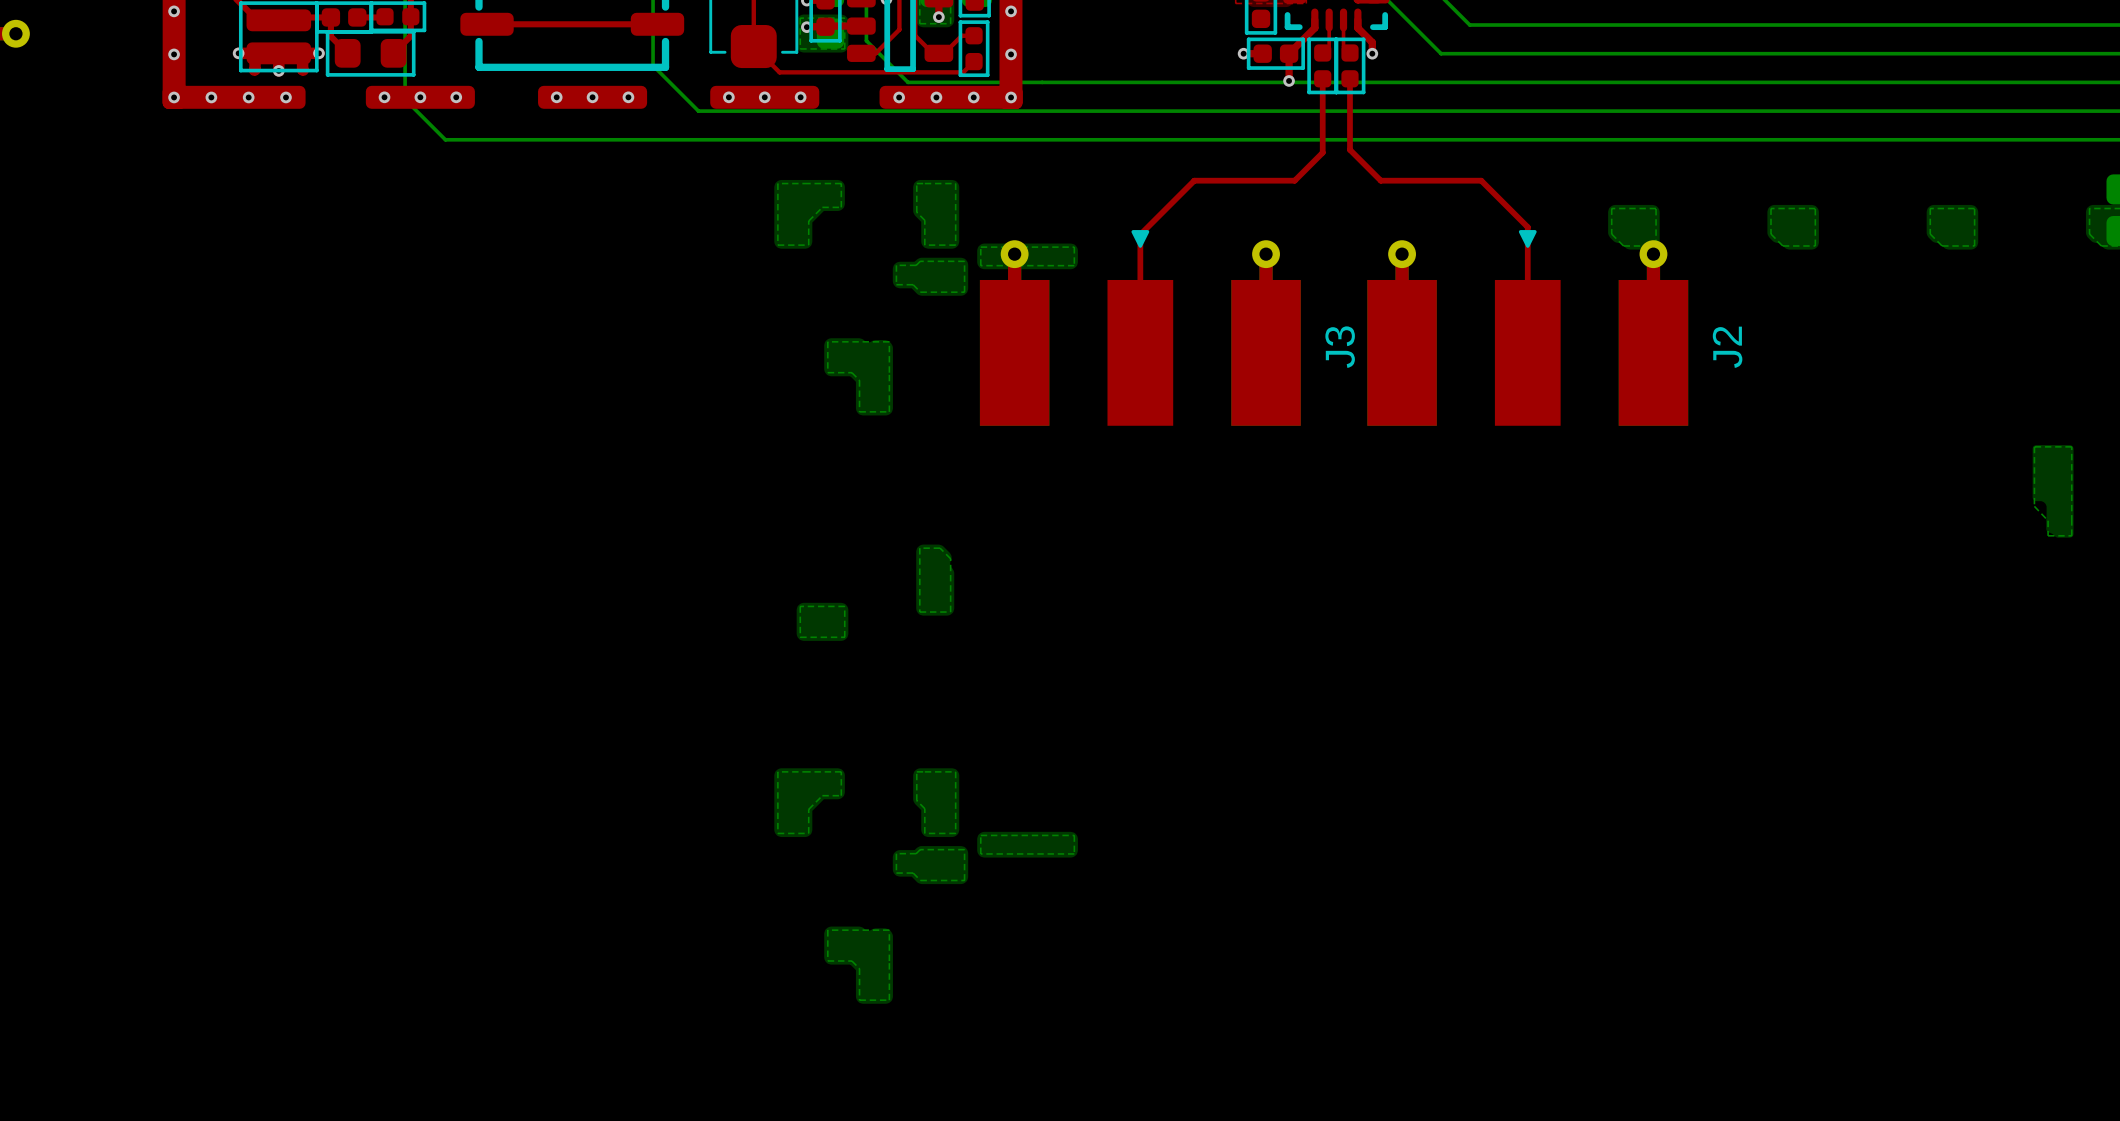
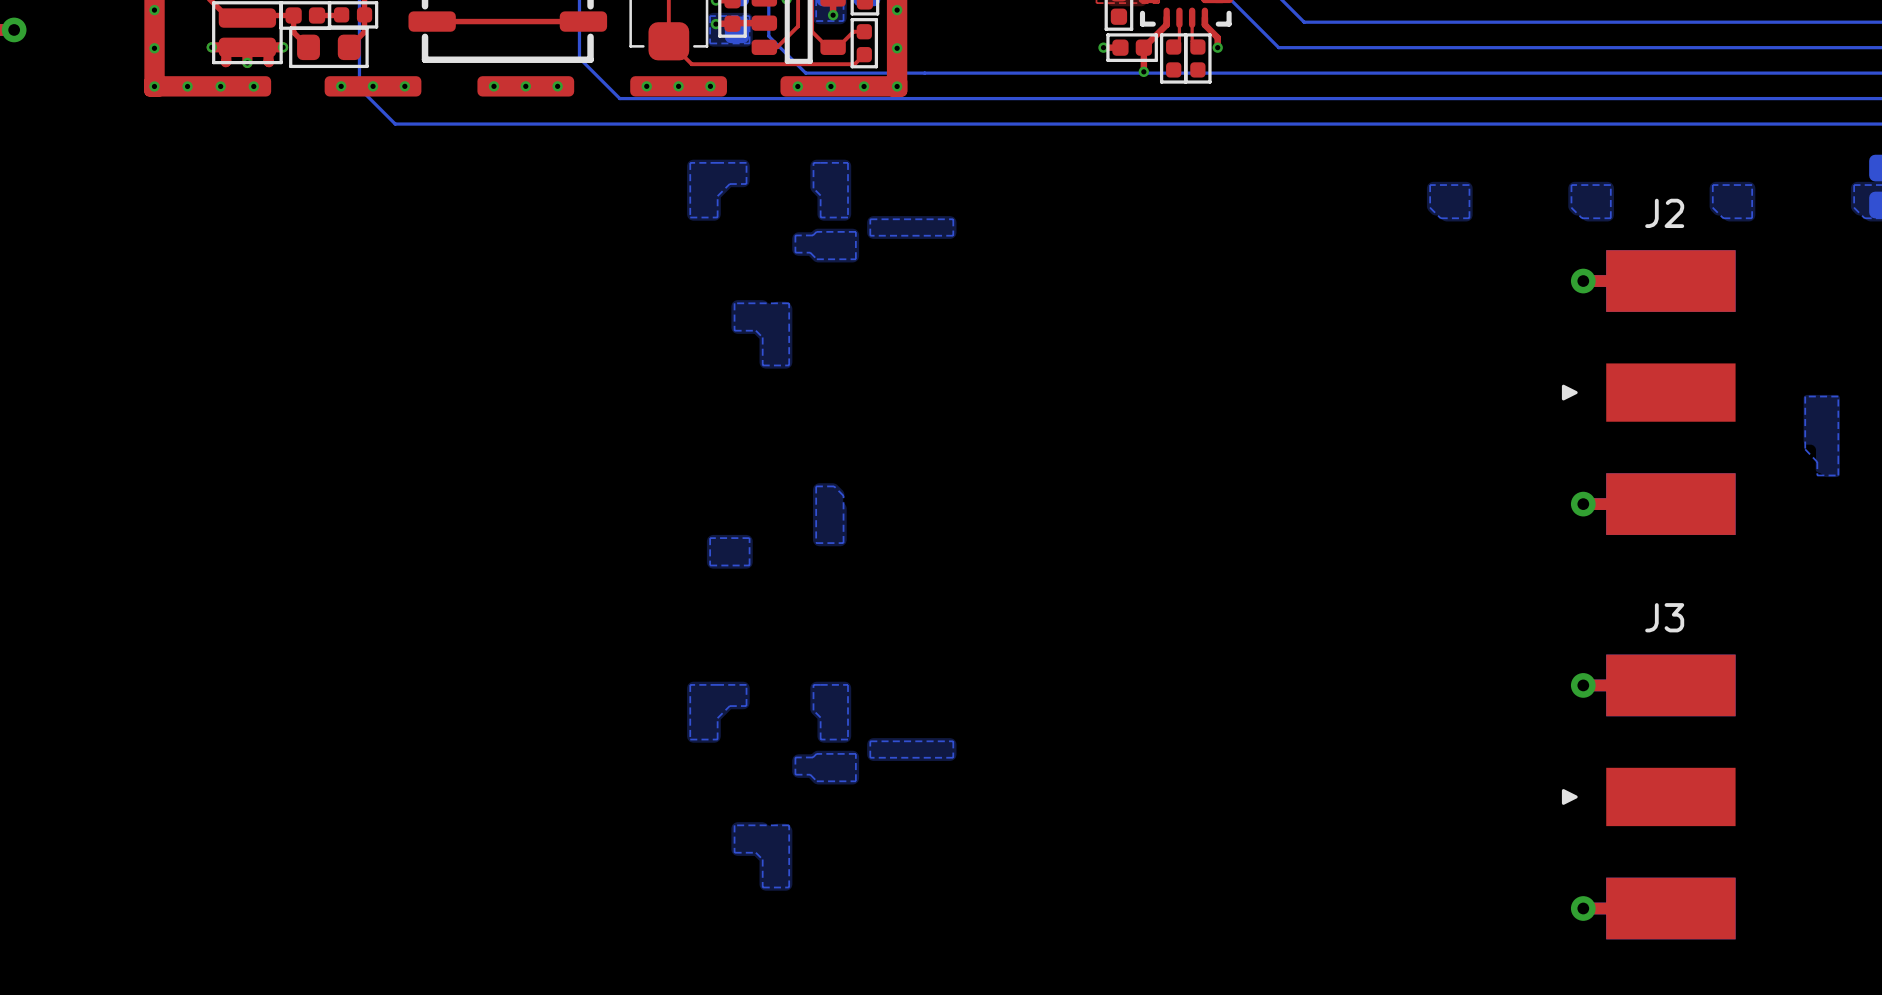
top track: (1322, 78) (1322, 152) (1294, 180) (1194, 180) (1140, 234) (1140, 352) -> none
top track: (1349, 78) (1349, 149) (1380, 180) (1481, 180) (1527, 227) (1527, 352) -> none
J3 rotation: 0° (1140, 327) -> 90° counterclockwise (1648, 796)
J3 position: (1140, 327) -> (1648, 796)
J2 rotation: 0° (1527, 327) -> 90° counterclockwise (1648, 392)
J2 position: (1527, 327) -> (1648, 392)

